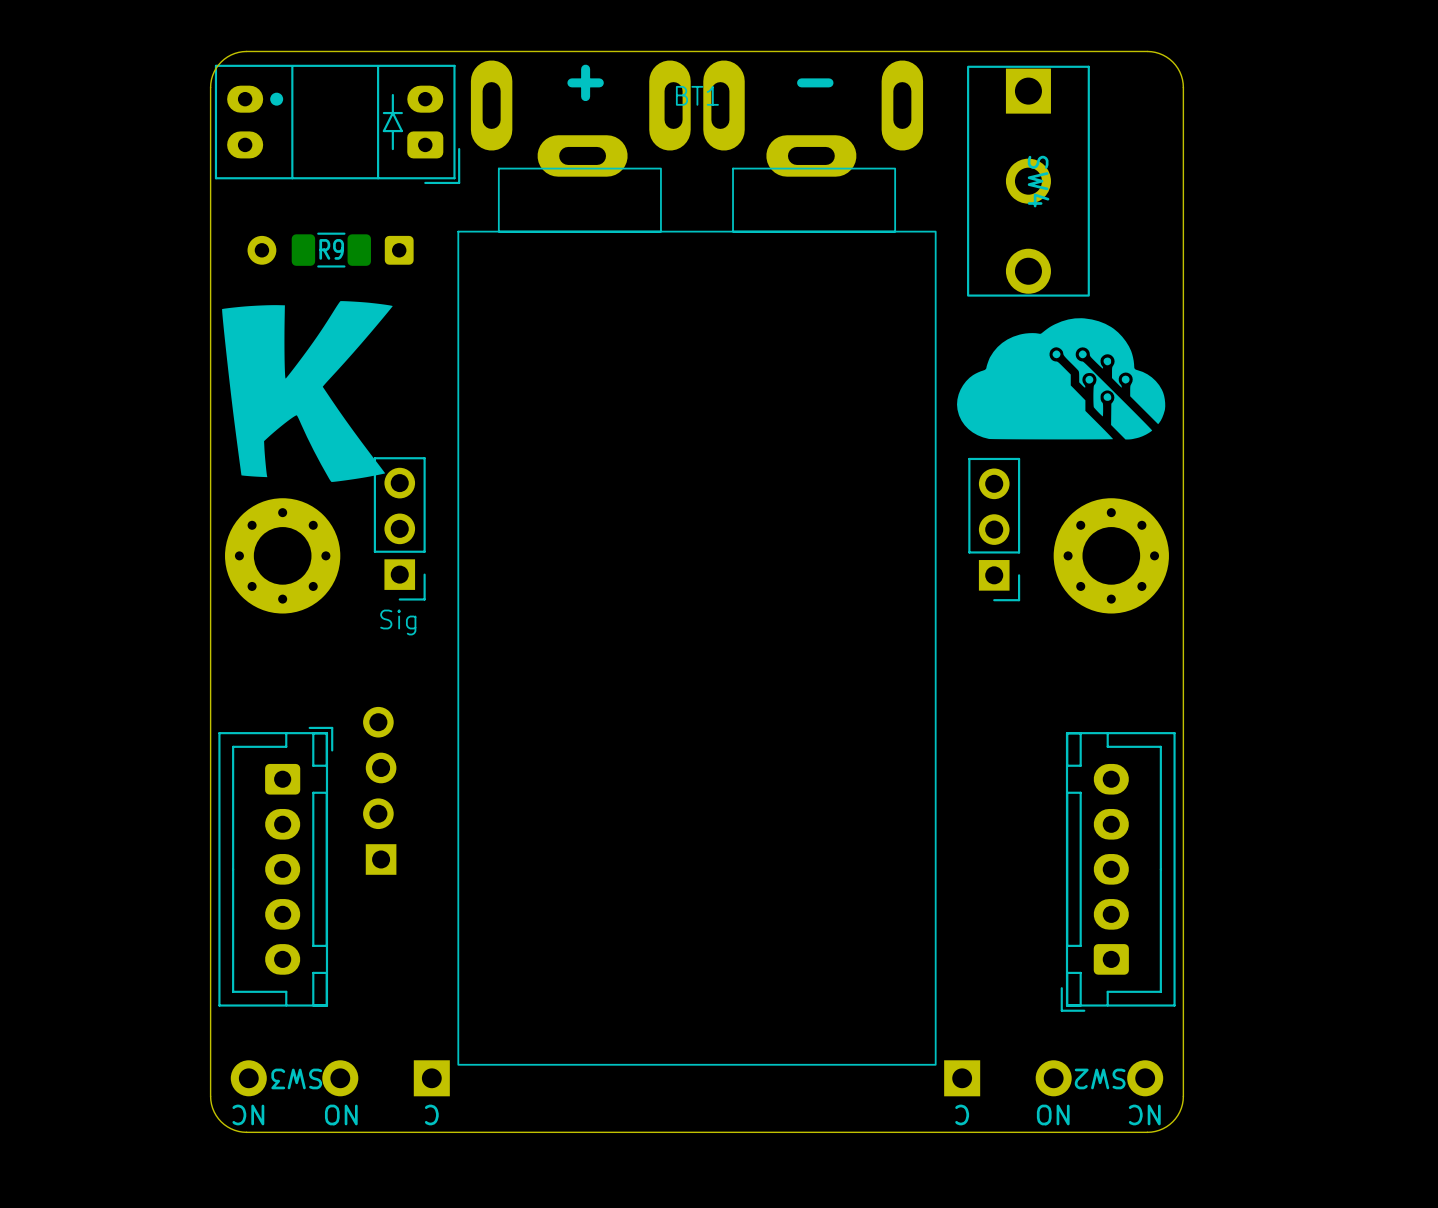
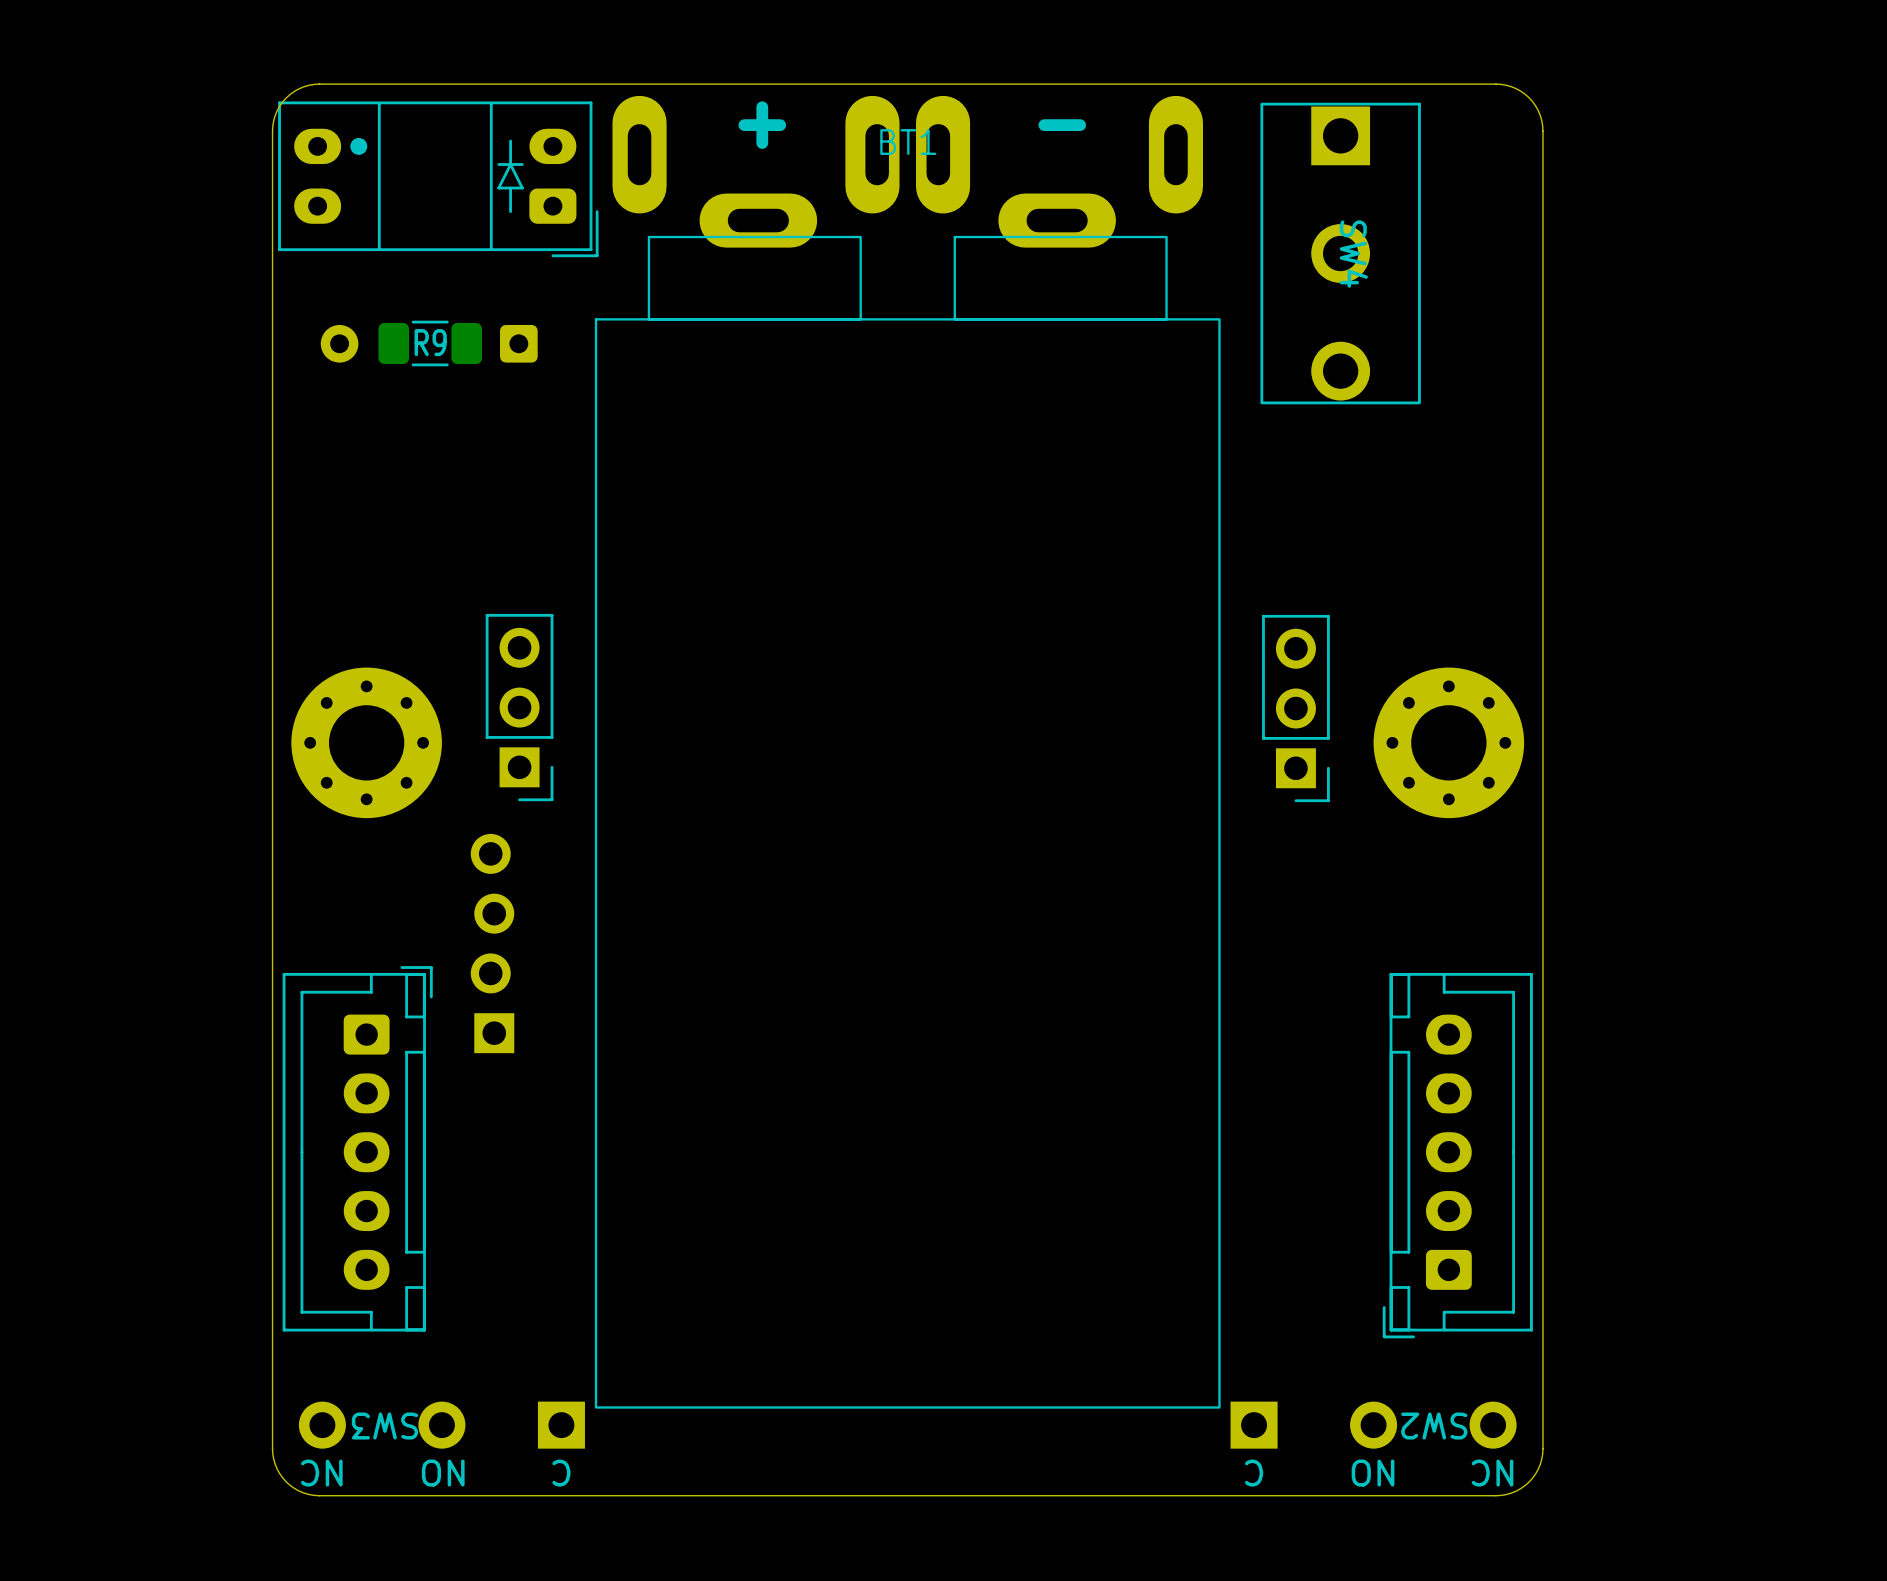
drawing: [222, 301, 393, 482] -> none
drawing: [957, 318, 1166, 440] -> none
text: Sig (398, 622) -> none
part position: (379, 790) -> (492, 943)

